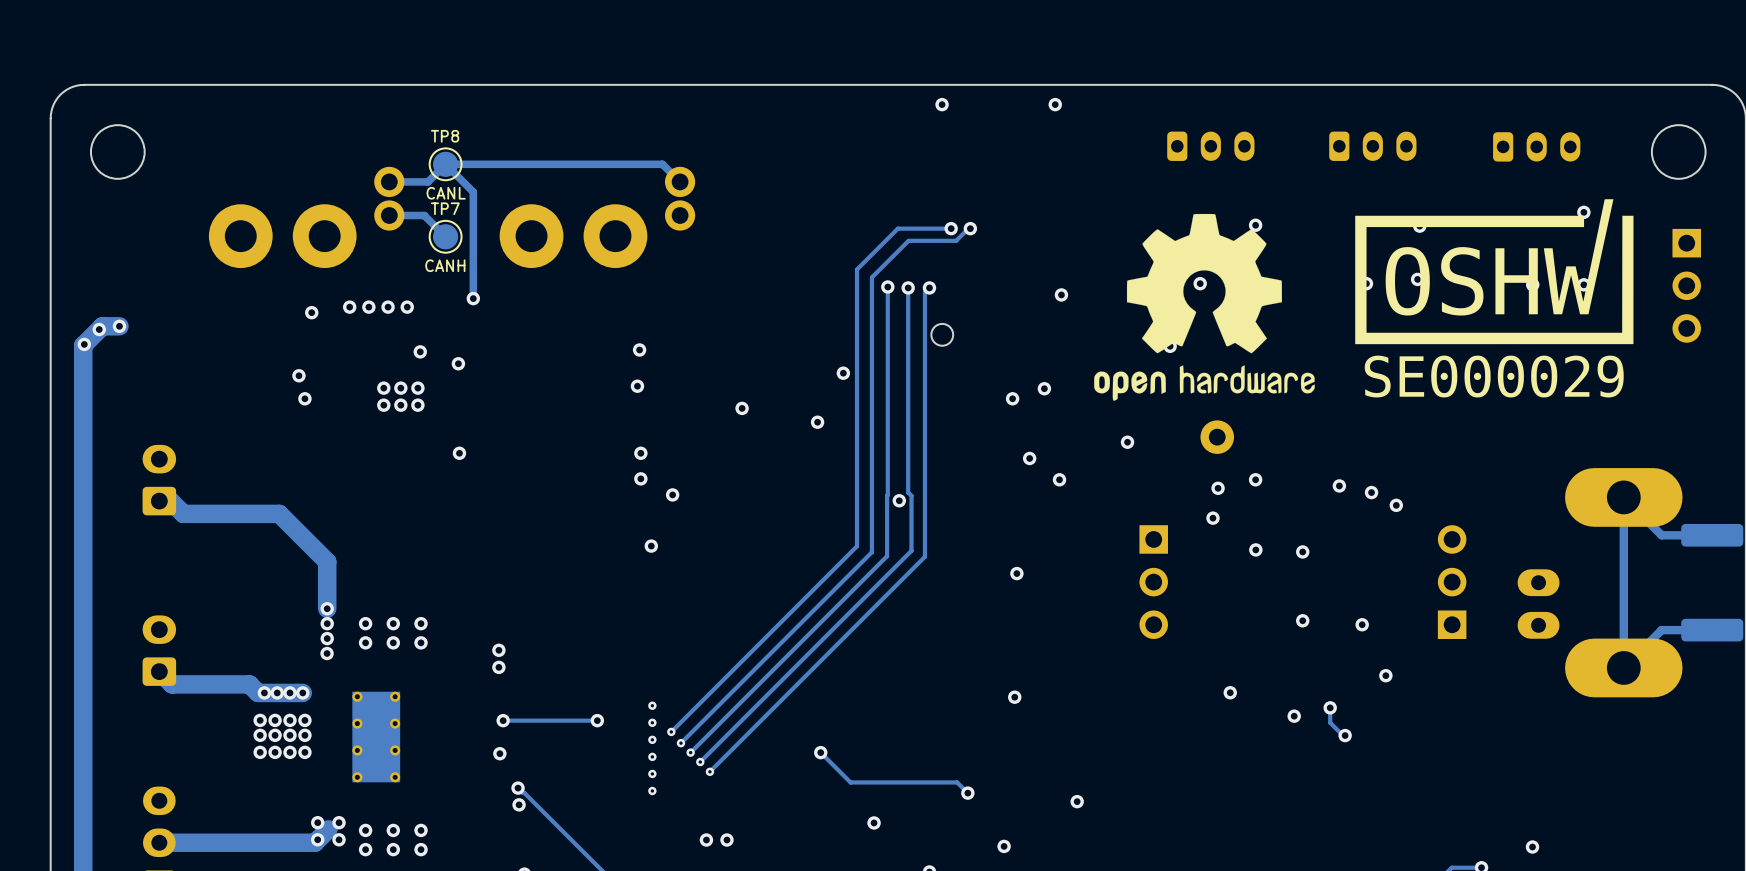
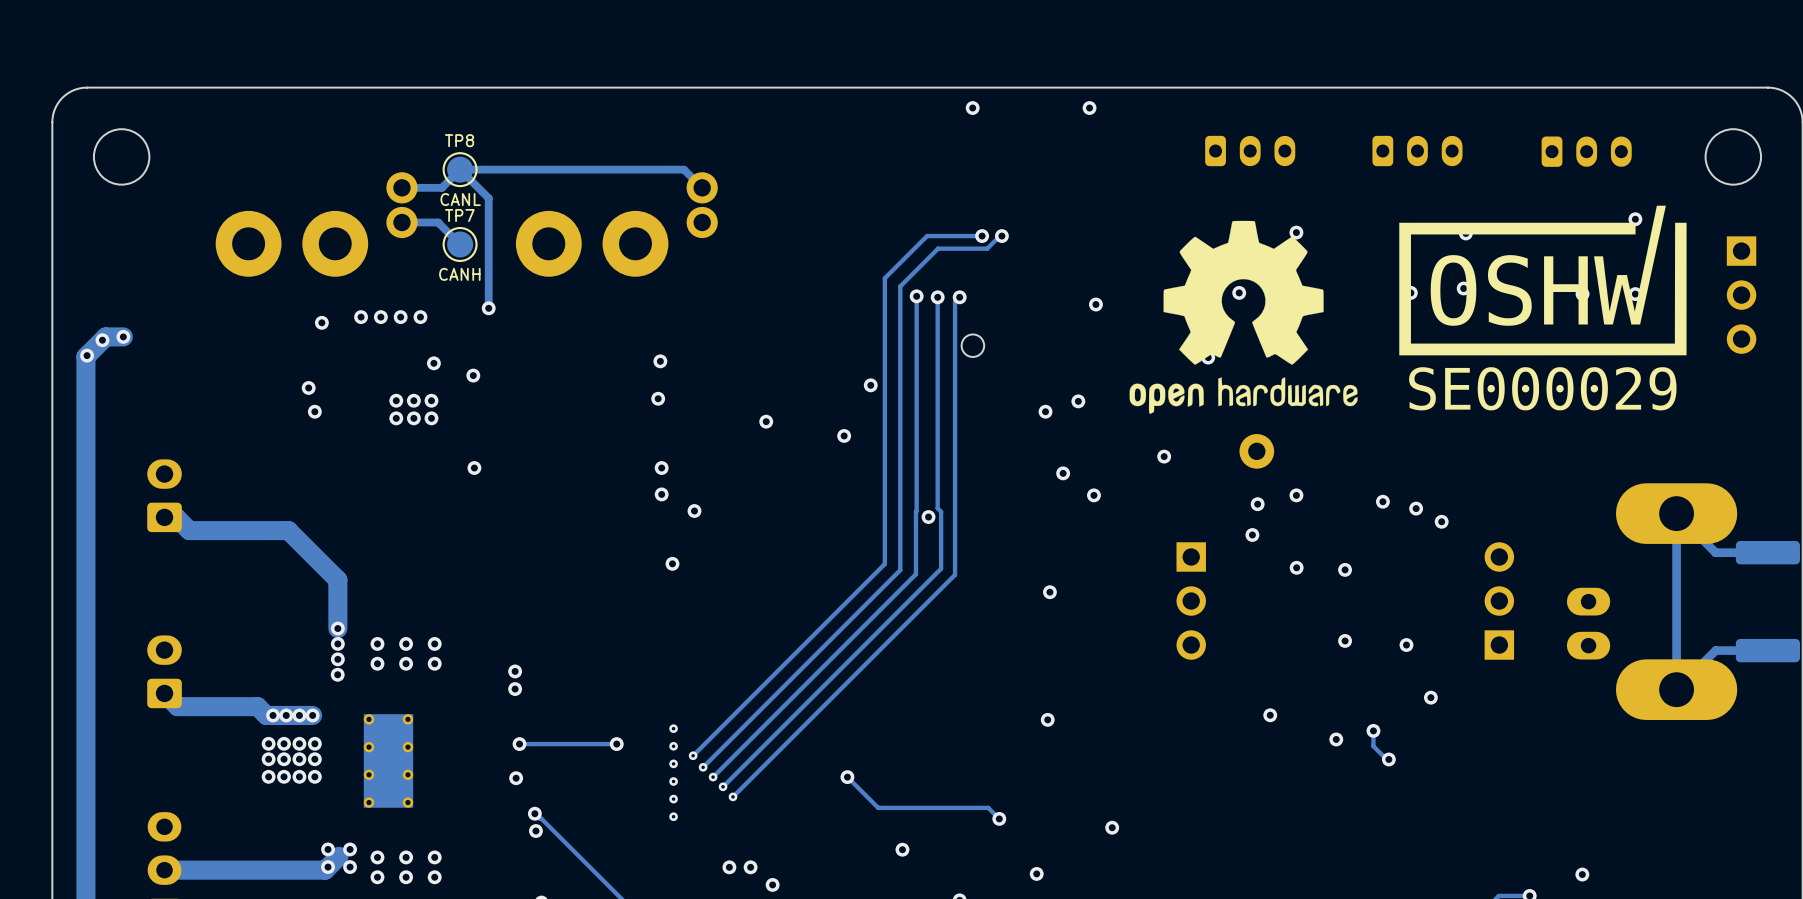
via: none -> (772, 884)

